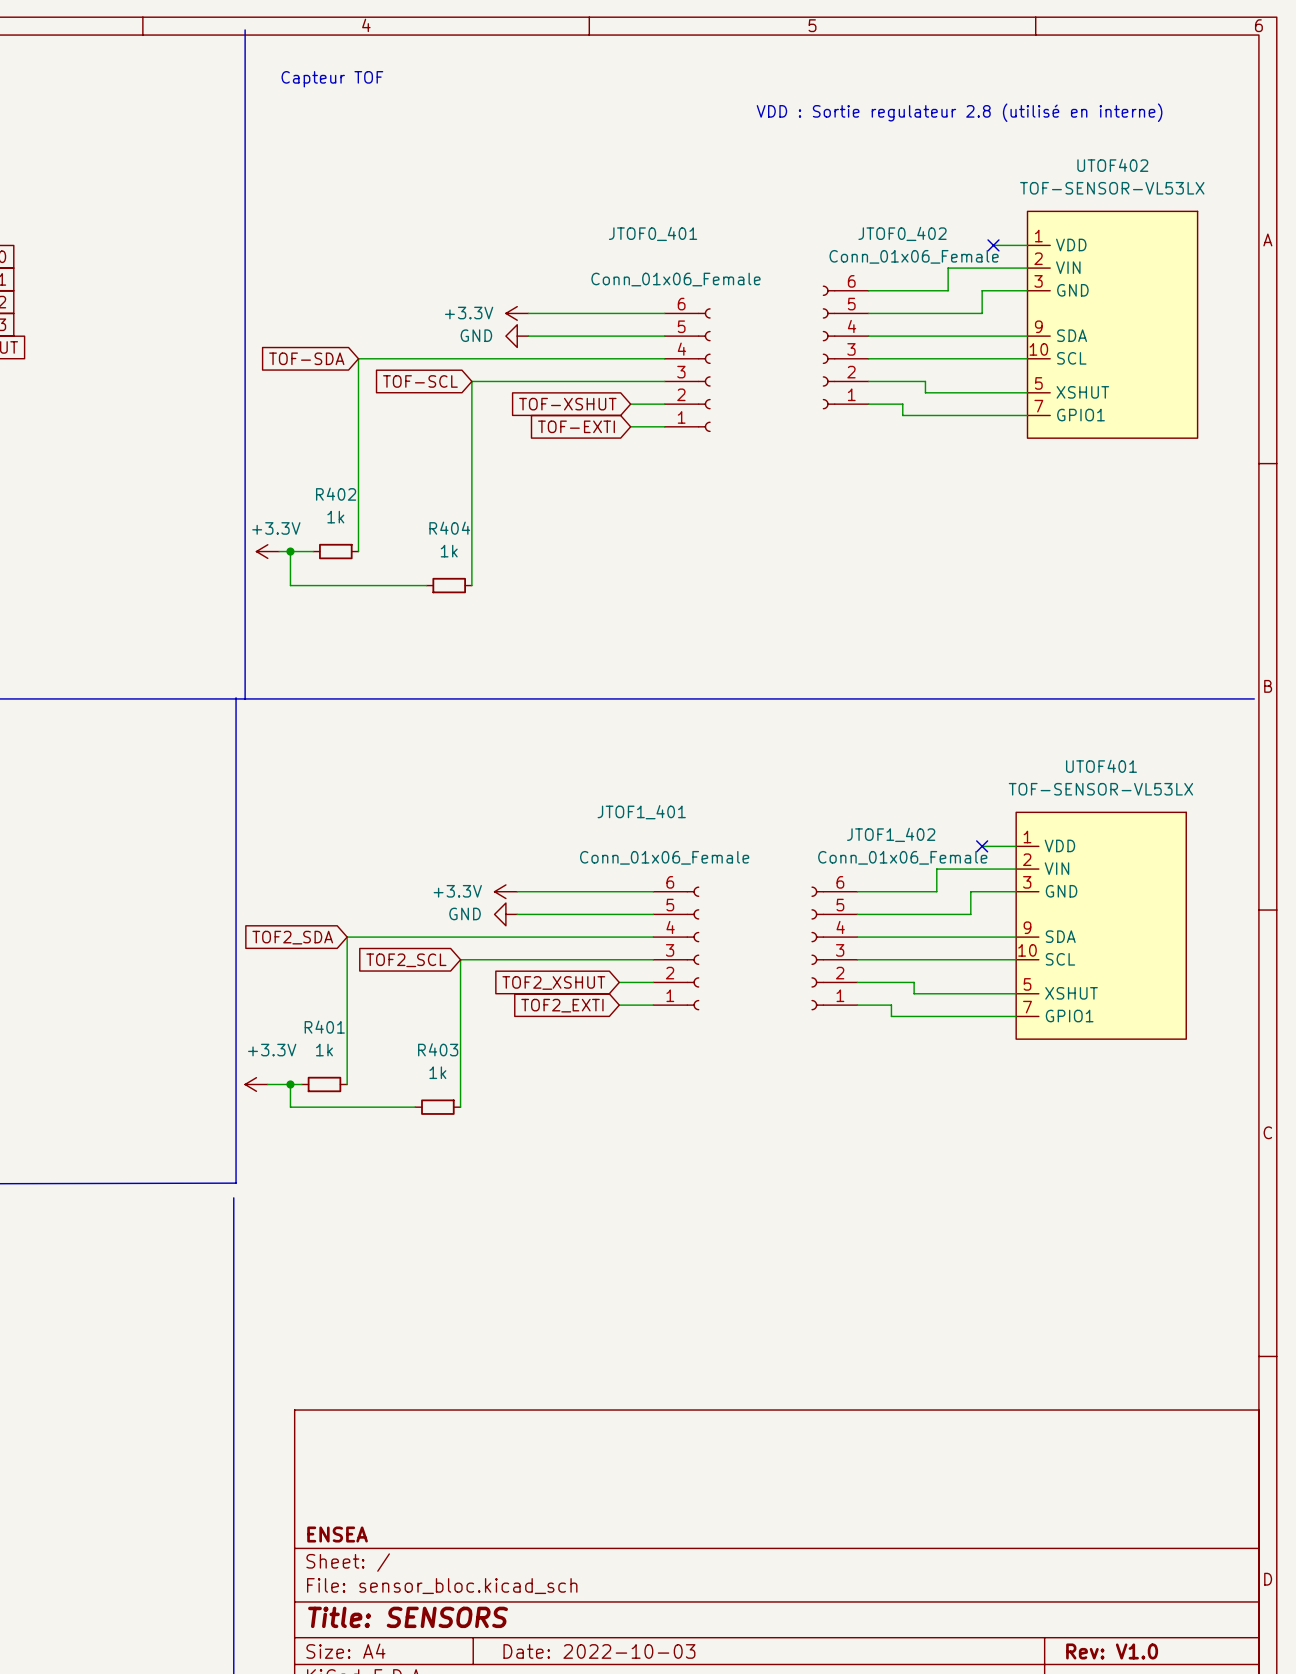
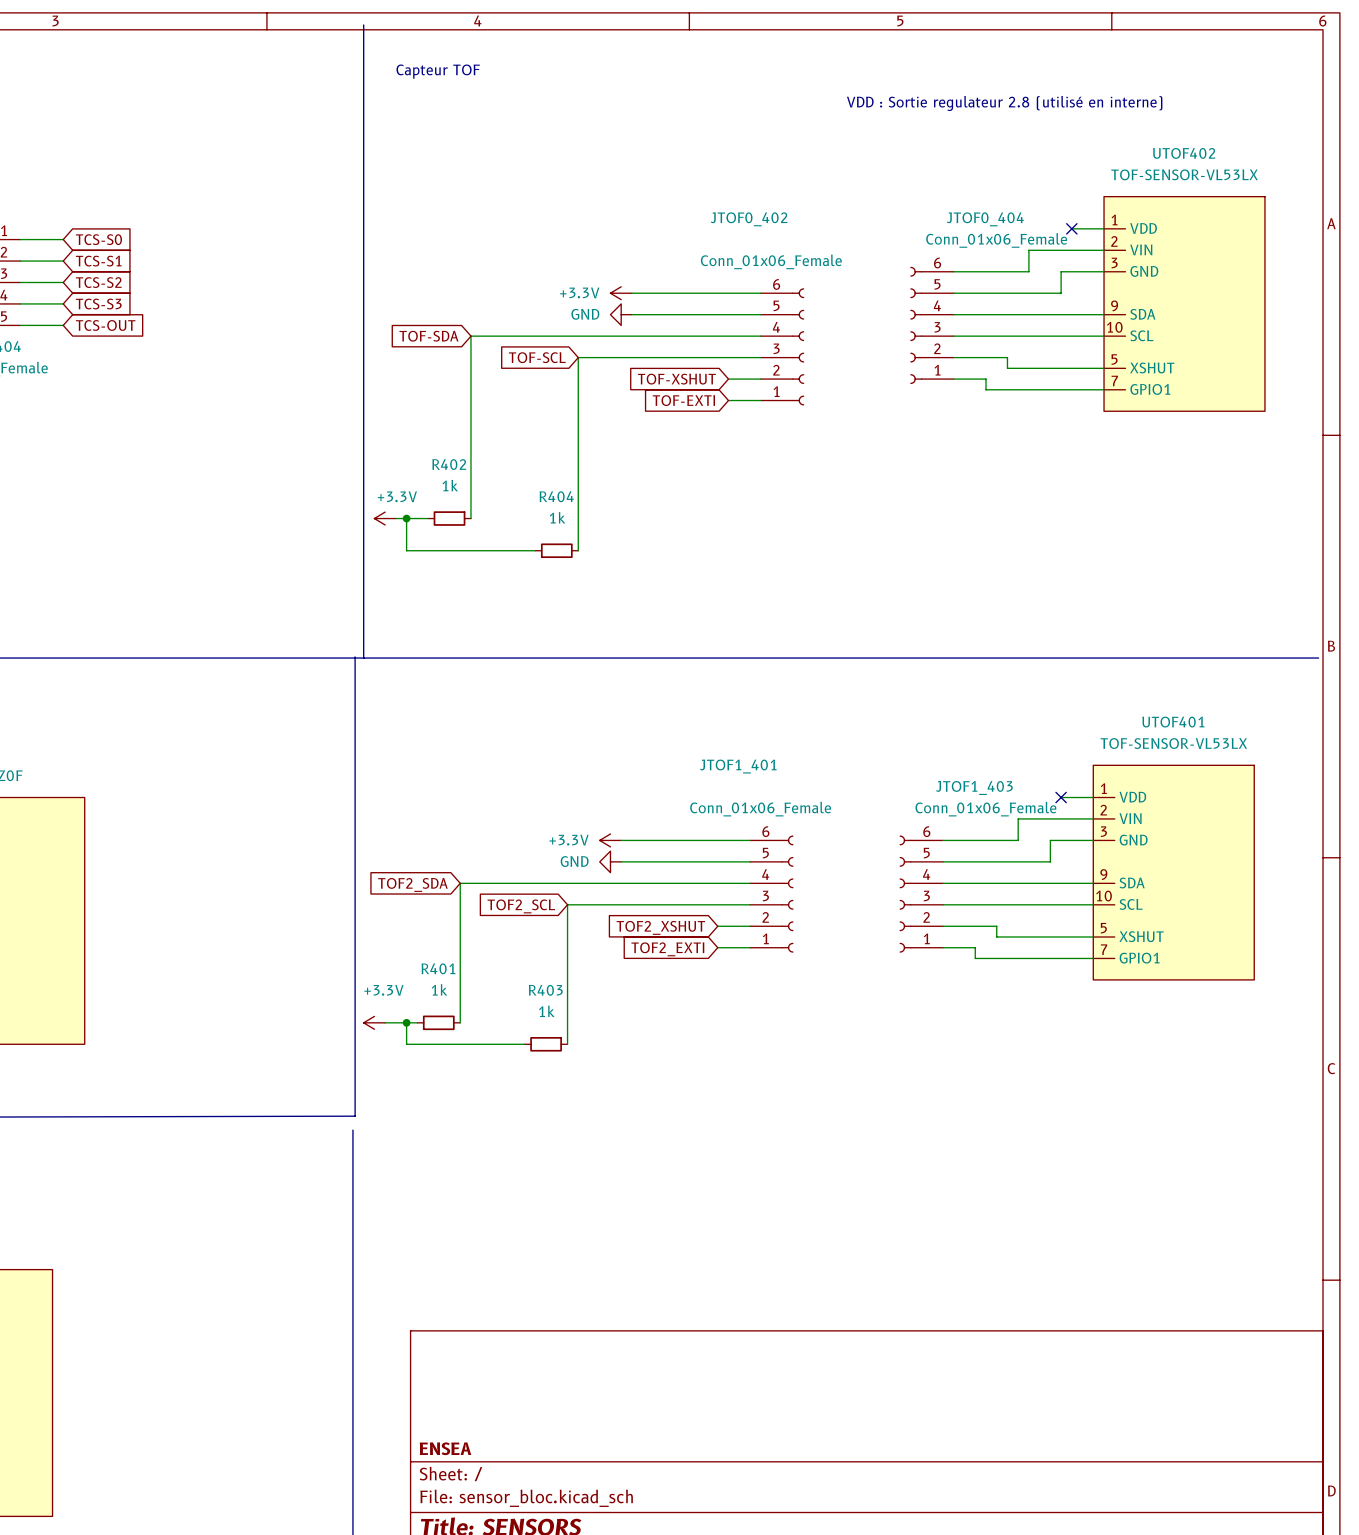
JTOF0_401 name: JTOF0_401 (653, 233) -> JTOF0_402 (749, 219)
JTOF0_402 name: JTOF0_402 (902, 233) -> JTOF0_404 (985, 219)
JTOF1_402 name: JTOF1_402 (891, 834) -> JTOF1_403 (974, 787)

